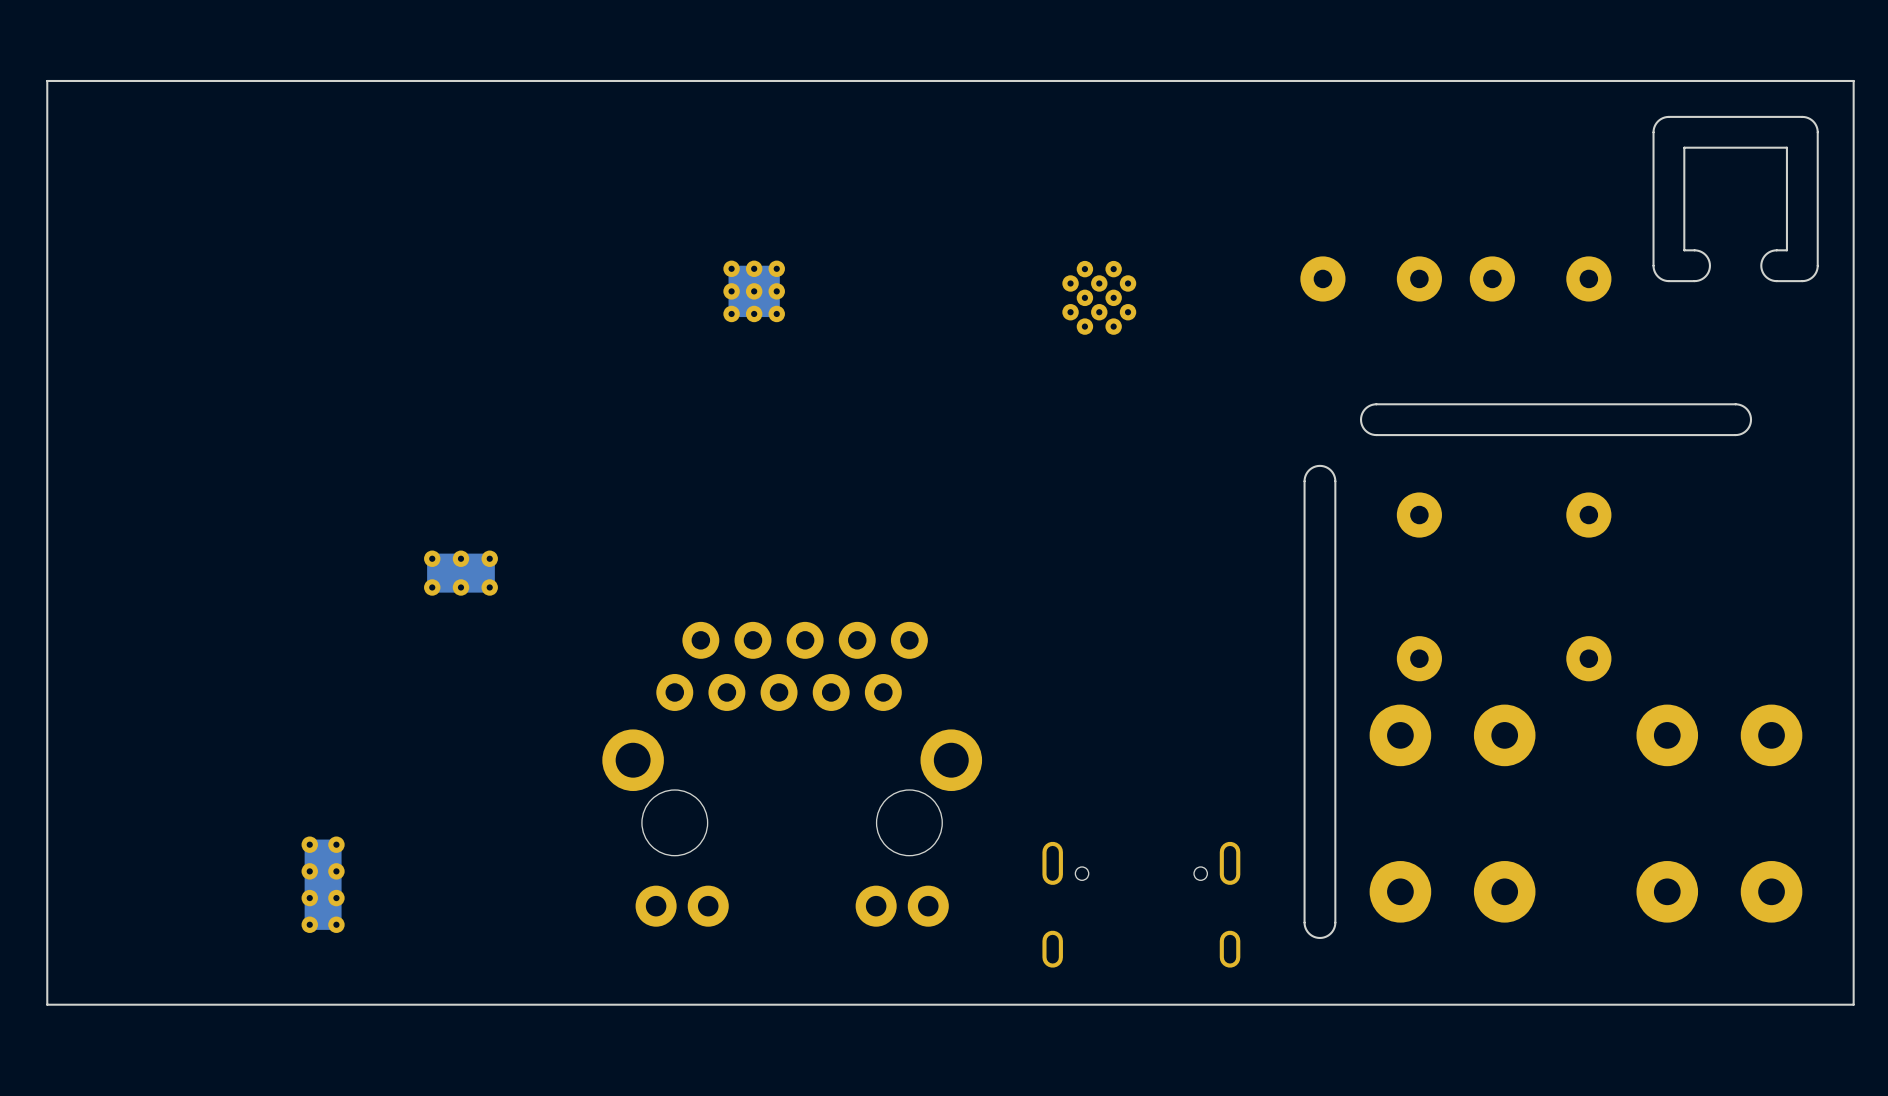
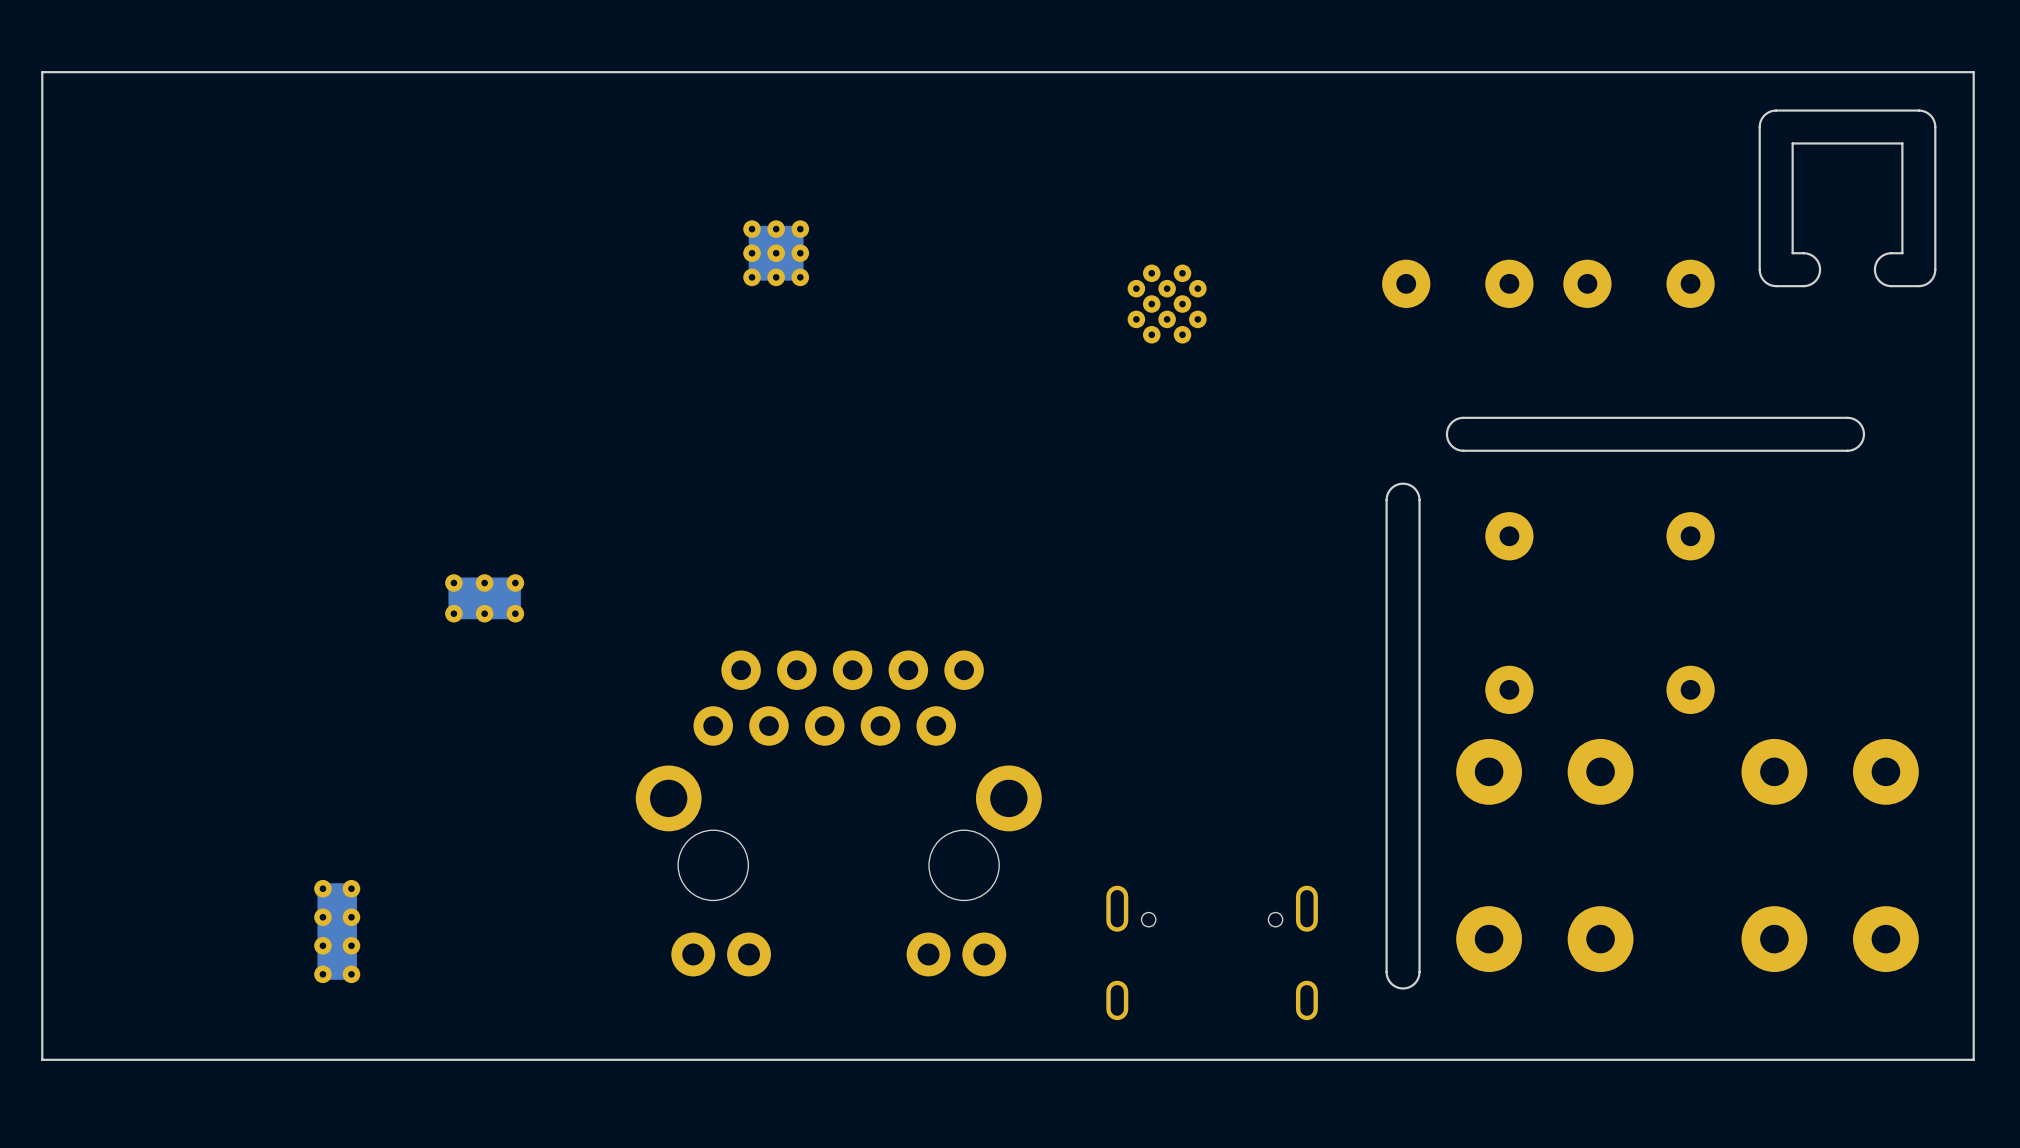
part position: (754, 291) -> (776, 253)

